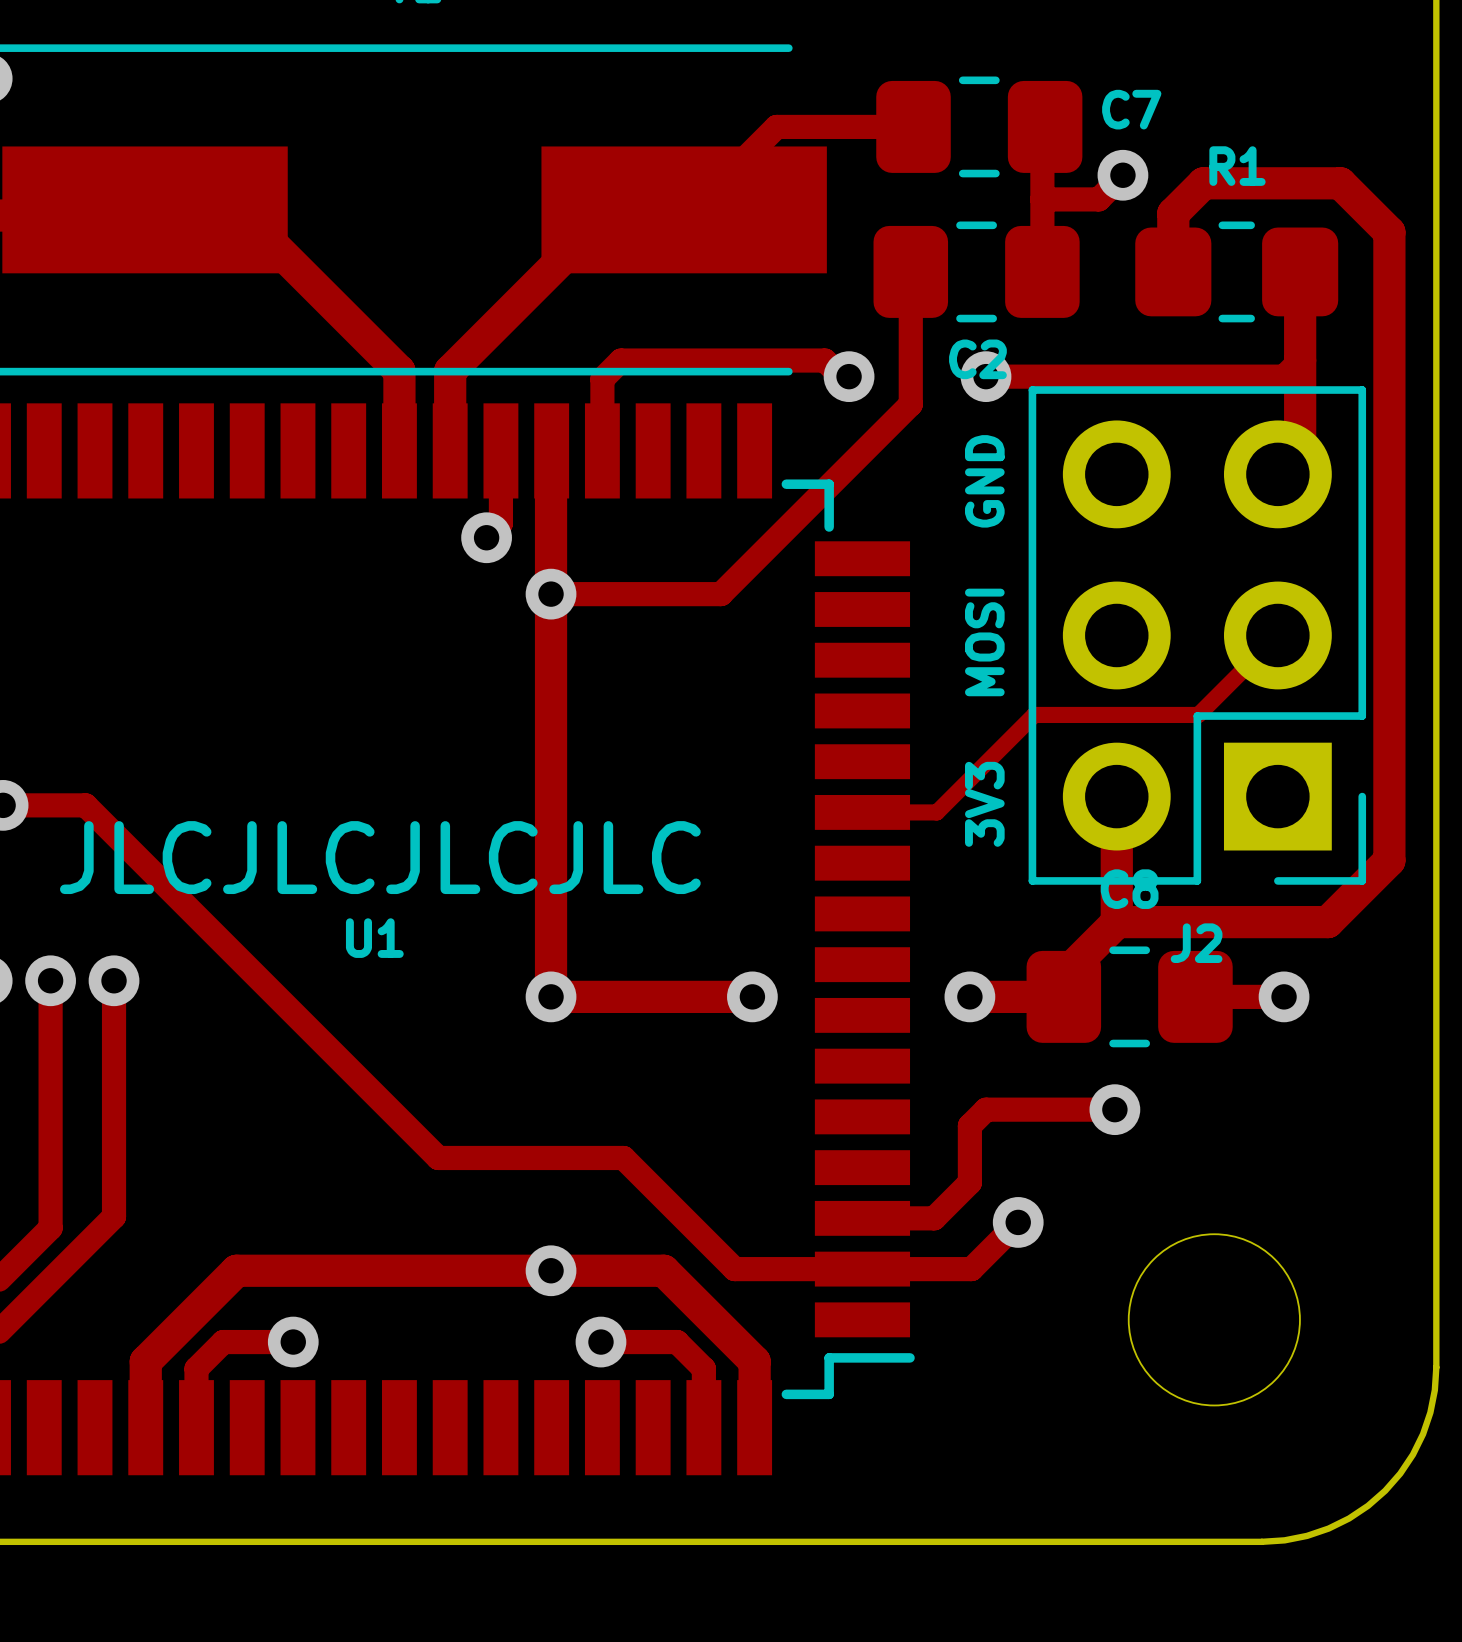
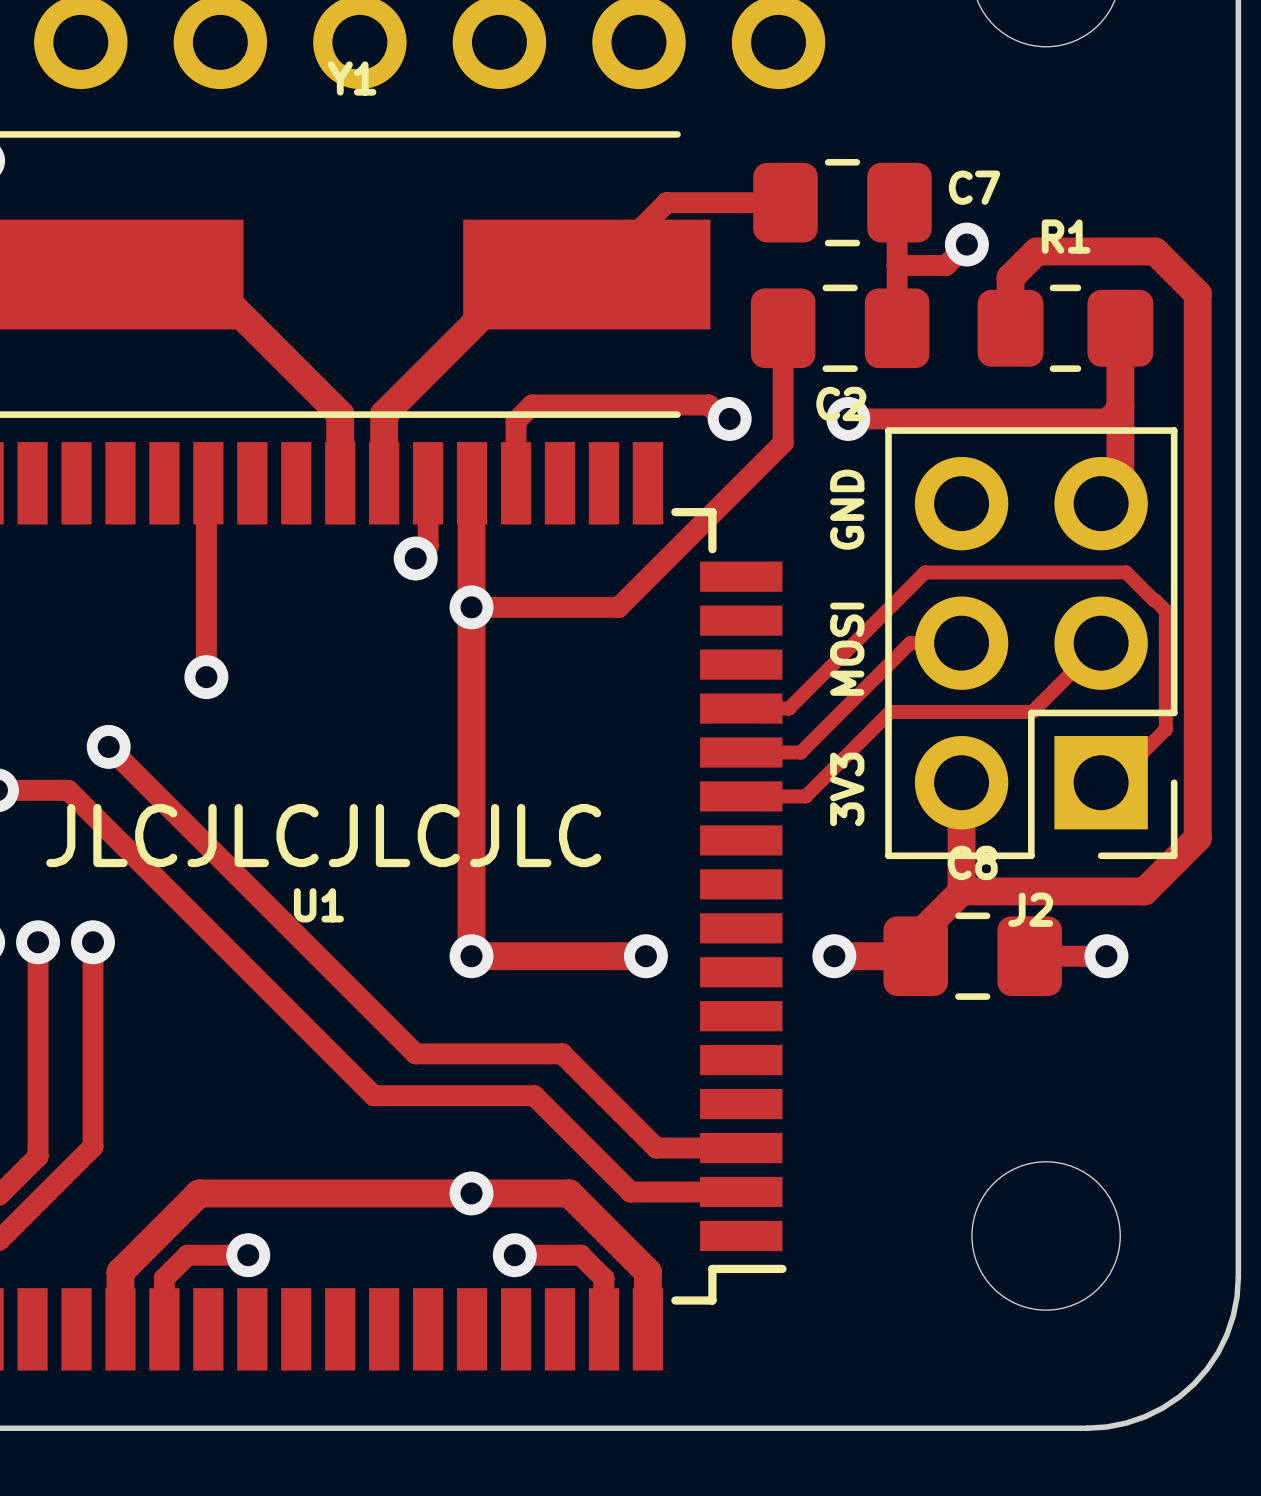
track: none -> (208, 483) (206, 485) (206, 677)
track: none -> (961, 643) (910, 643) (800, 752) (741, 752)
via: none -> (206, 677)
track: none -> (741, 708) (788, 708) (925, 572) (1126, 572) (1165, 610) (1165, 729) (1112, 782) (1101, 782)
via: none -> (108, 746)
track: (1114, 1109) (986, 1109) (969, 1125) (969, 1182) (934, 1218) (862, 1218) -> (108, 746) (415, 1053) (562, 1053) (656, 1148) (741, 1148)
via: (1114, 1109) -> none
track: (1018, 1222) (971, 1269) (862, 1269) (864, 1270) -> none
via: (1018, 1222) -> none

